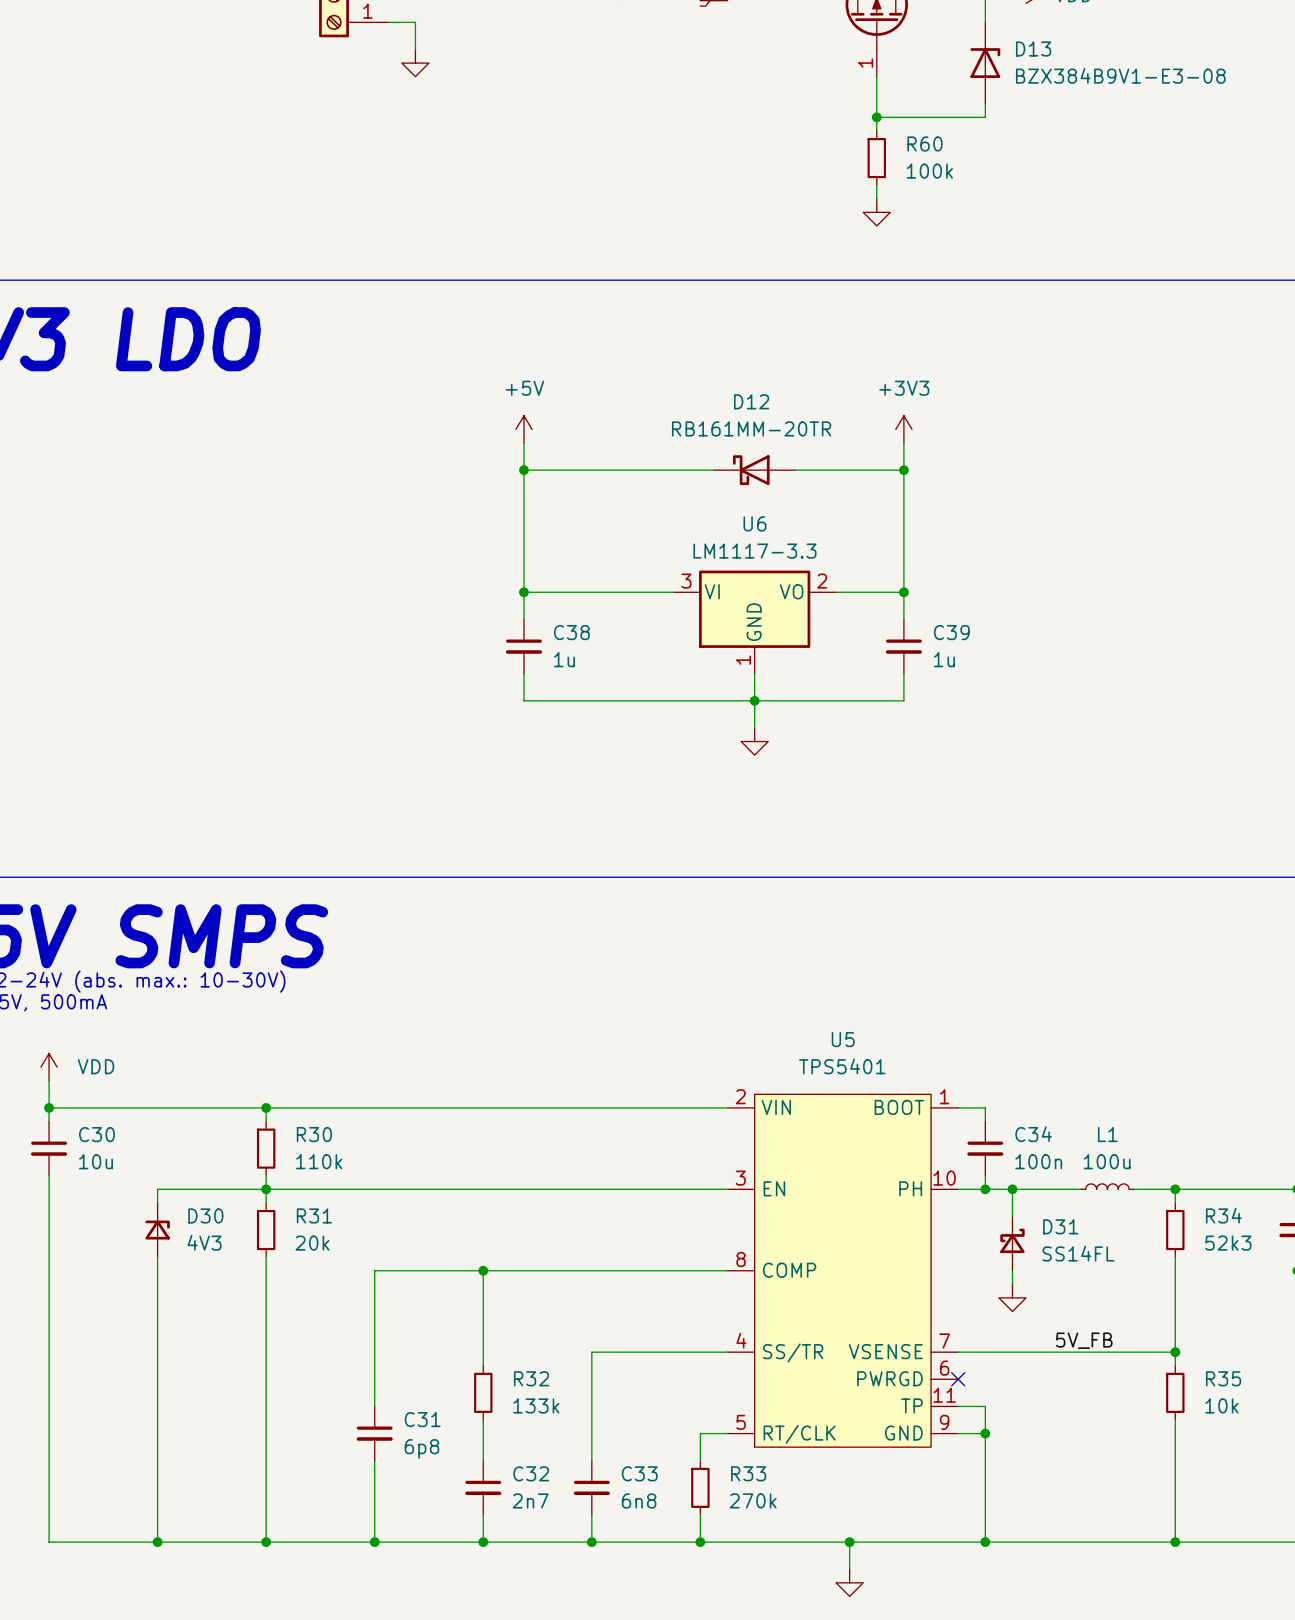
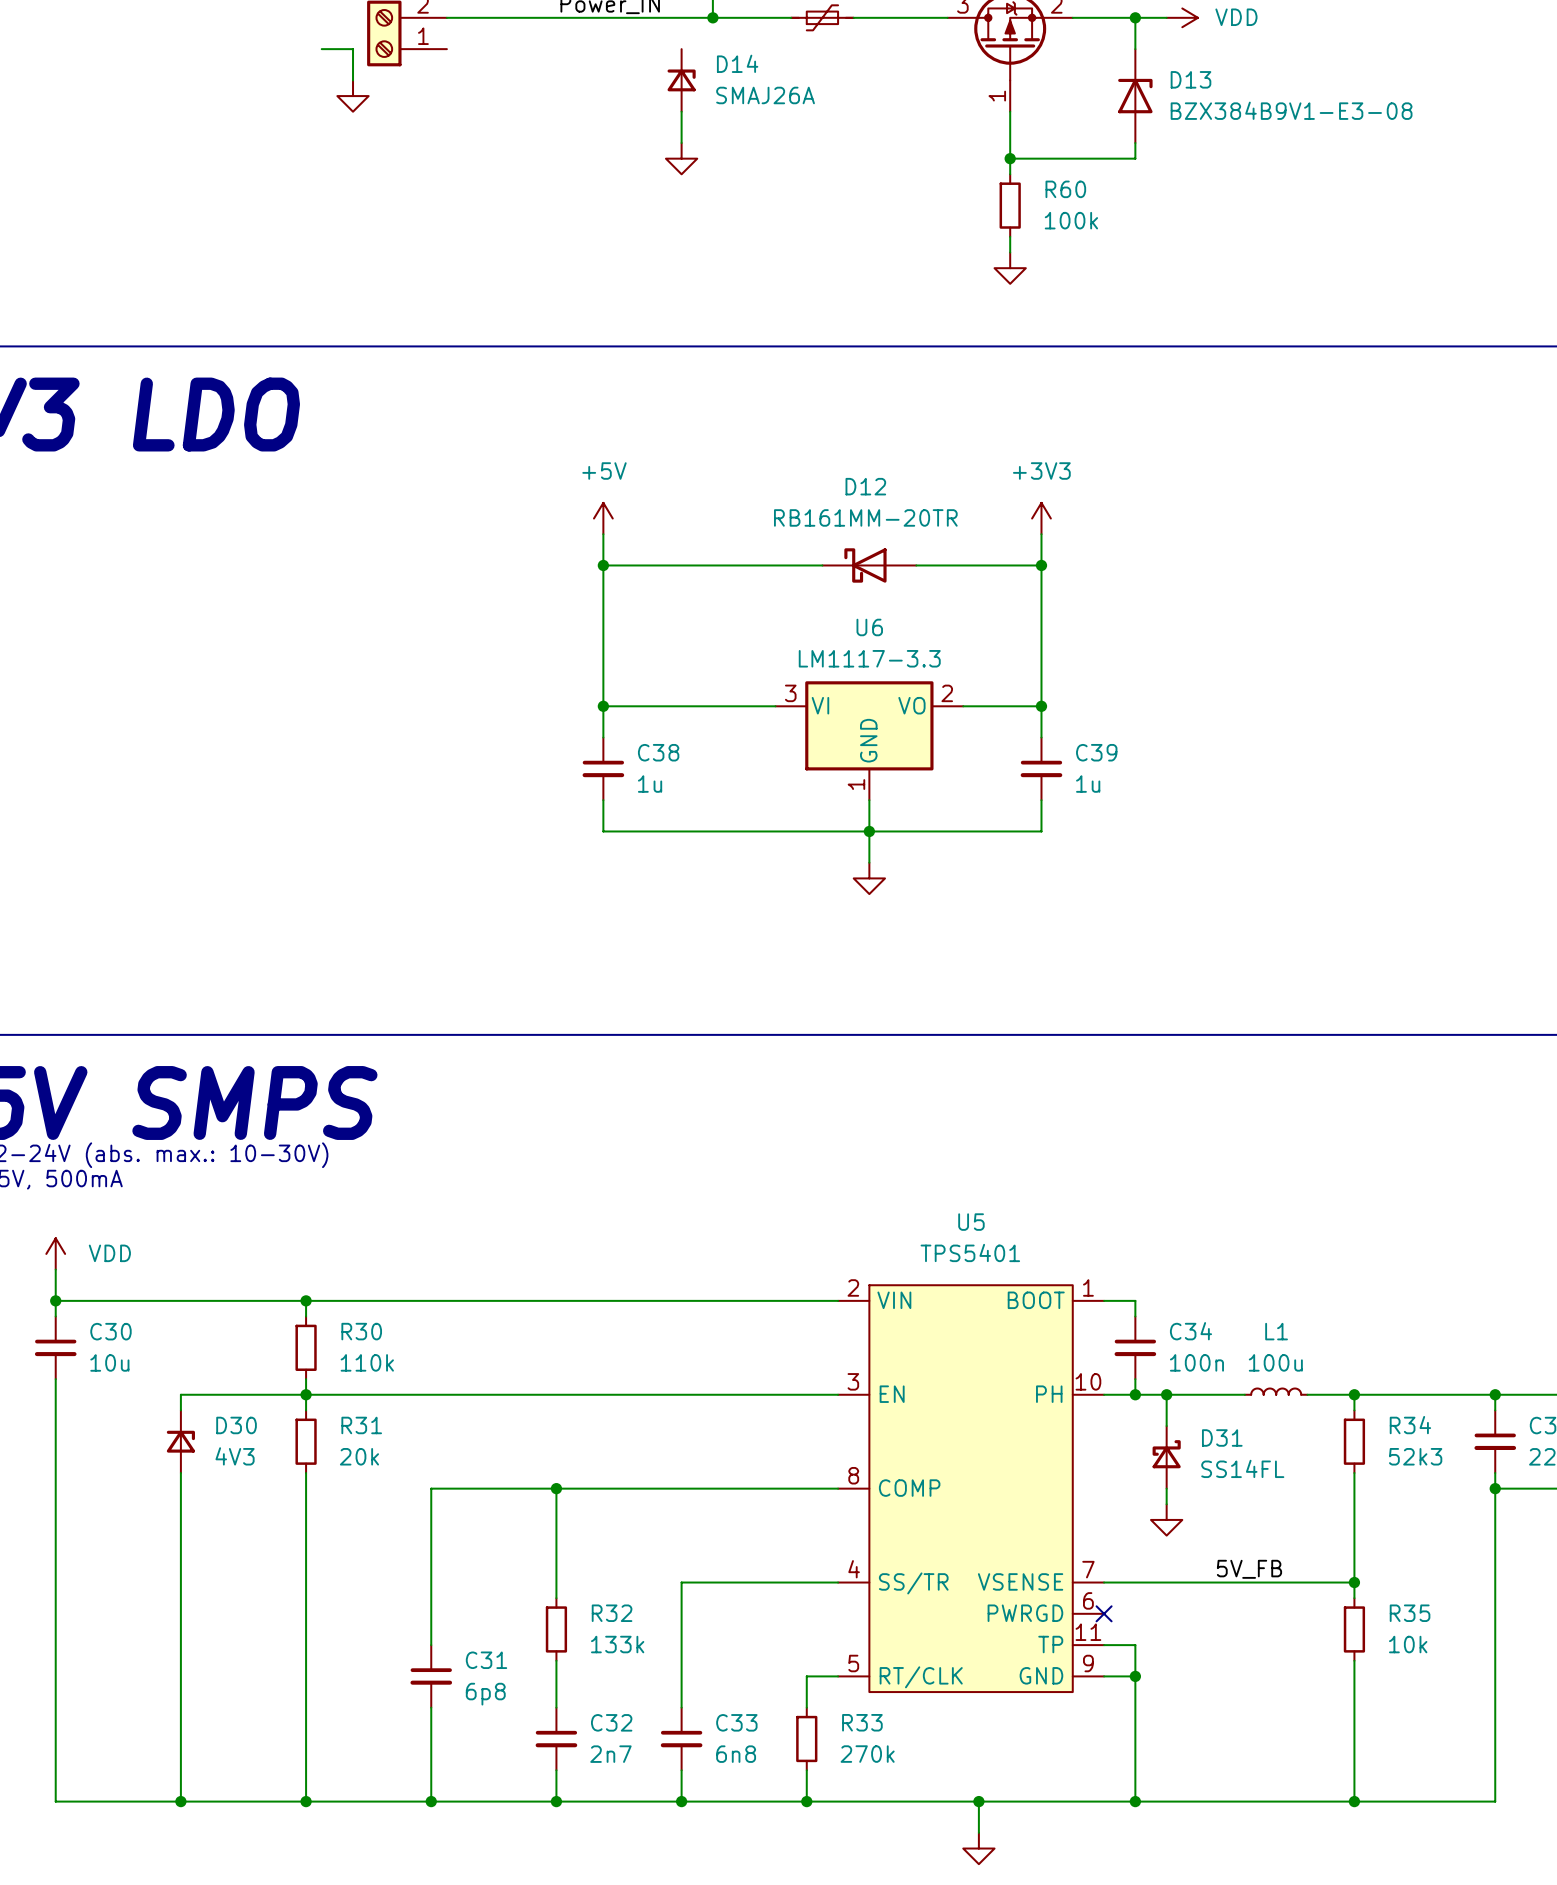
wire: (388, 22) (415, 22) (415, 49) -> (321, 49) (353, 49) (353, 80)
D14: none -> SMAJ26A (681, 80)
power symbol: none -> (353, 96)
power symbol: (415, 63) -> none
wire: none -> (681, 111) (681, 143)
power symbol: none -> (681, 158)

